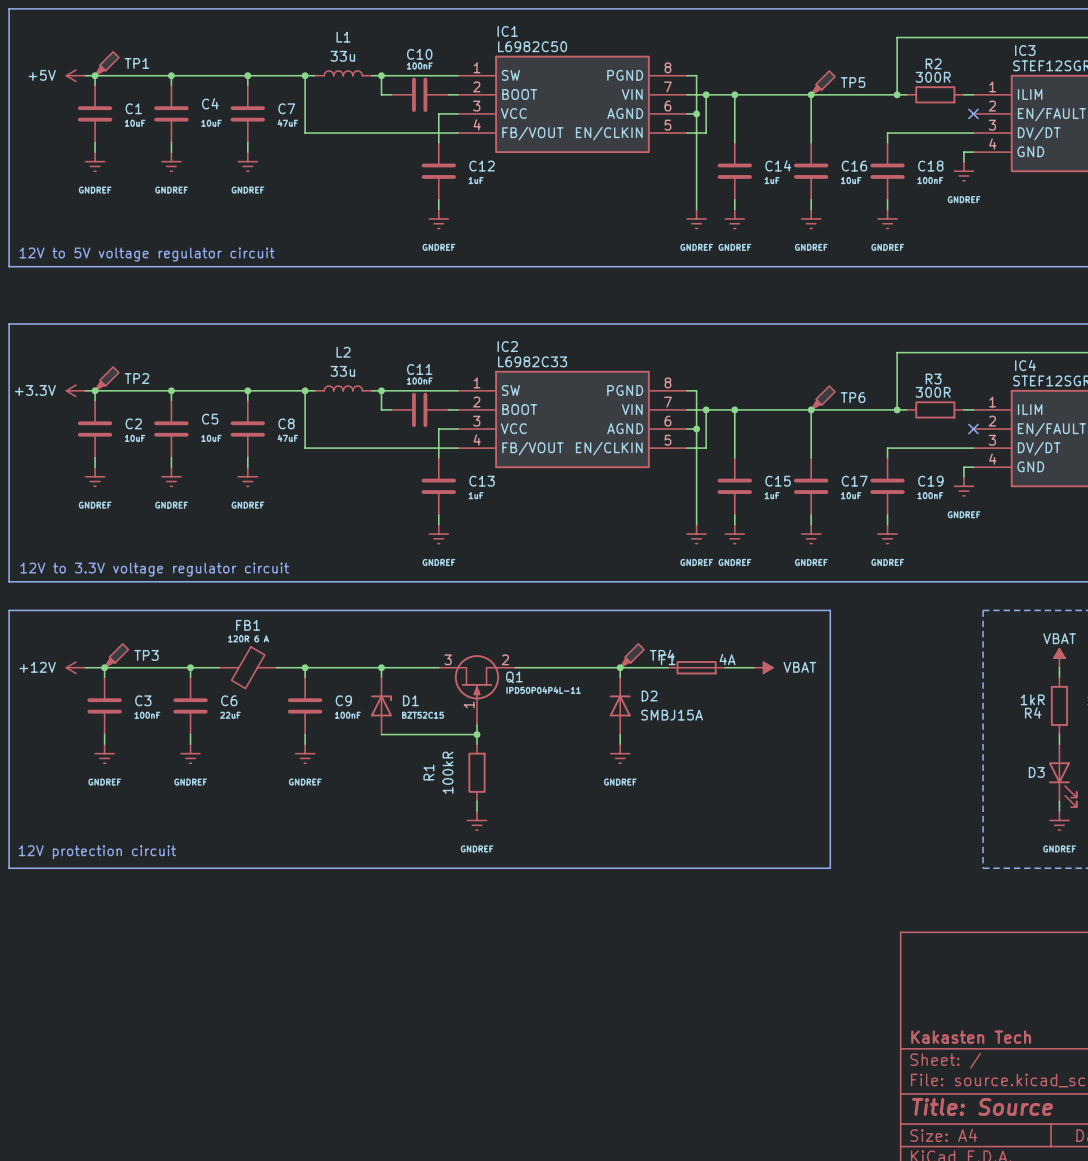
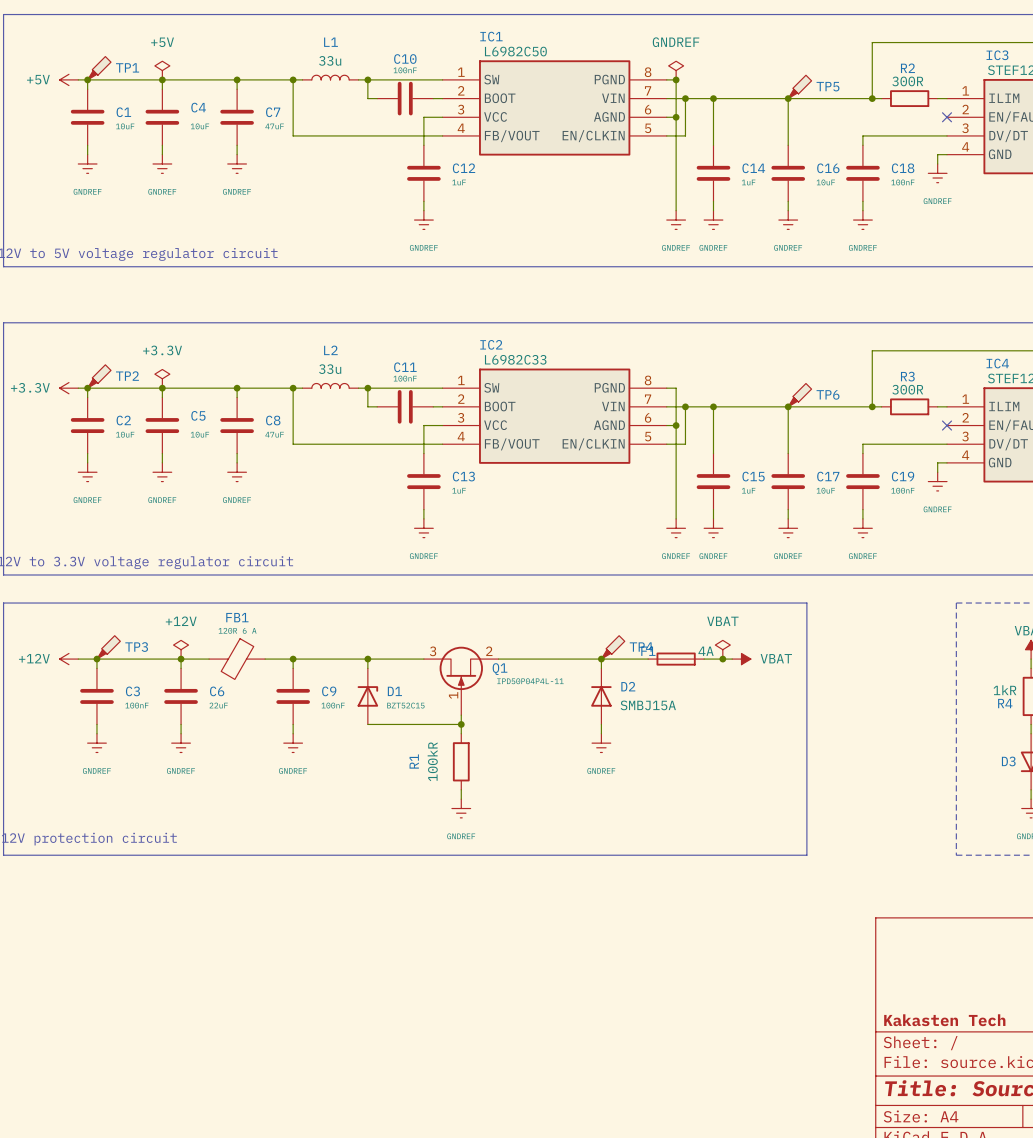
power symbol: none -> +5V (162, 70)
power symbol: none -> GNDREF (676, 70)
junction: none -> (676, 79)
power symbol: none -> +3.3V (162, 378)
power symbol: none -> +12V (181, 649)
power symbol: none -> VBAT (722, 649)
junction: none -> (722, 659)

